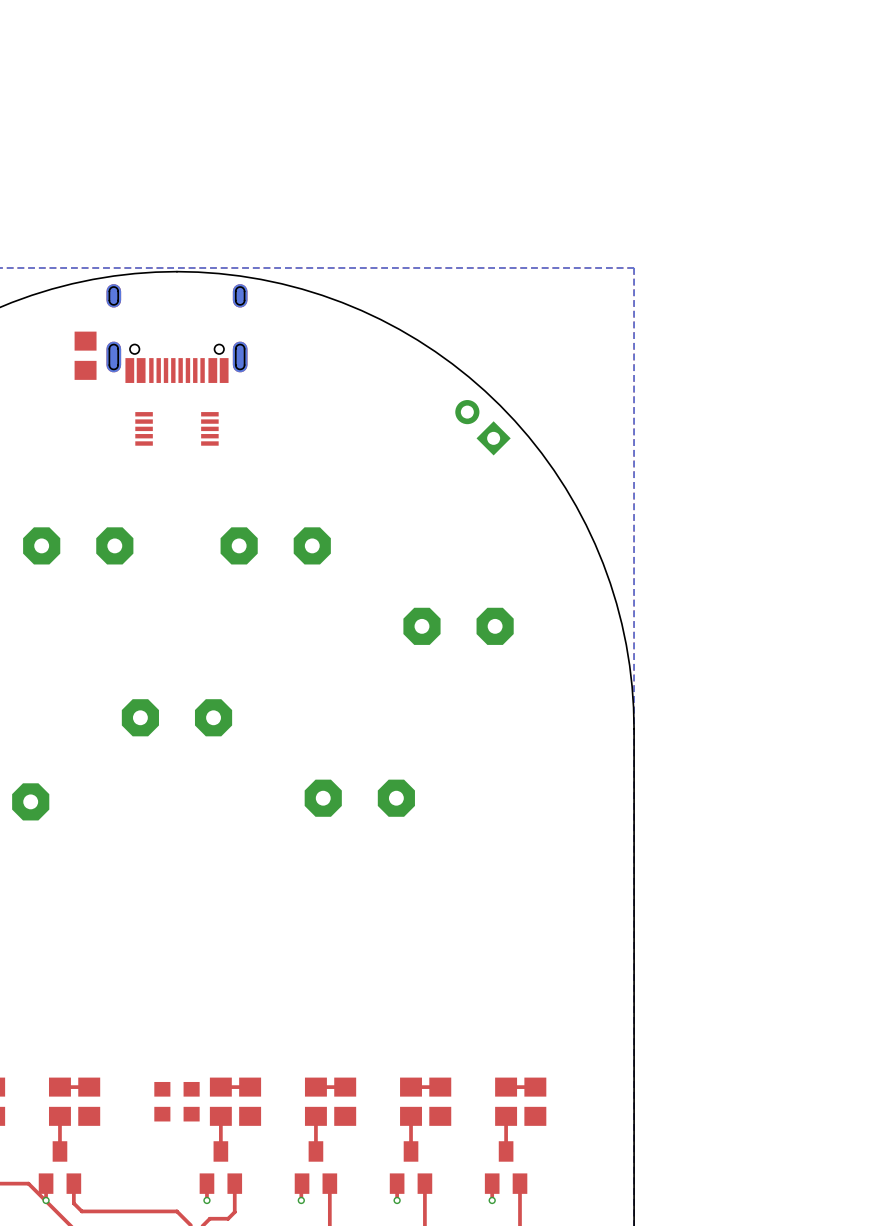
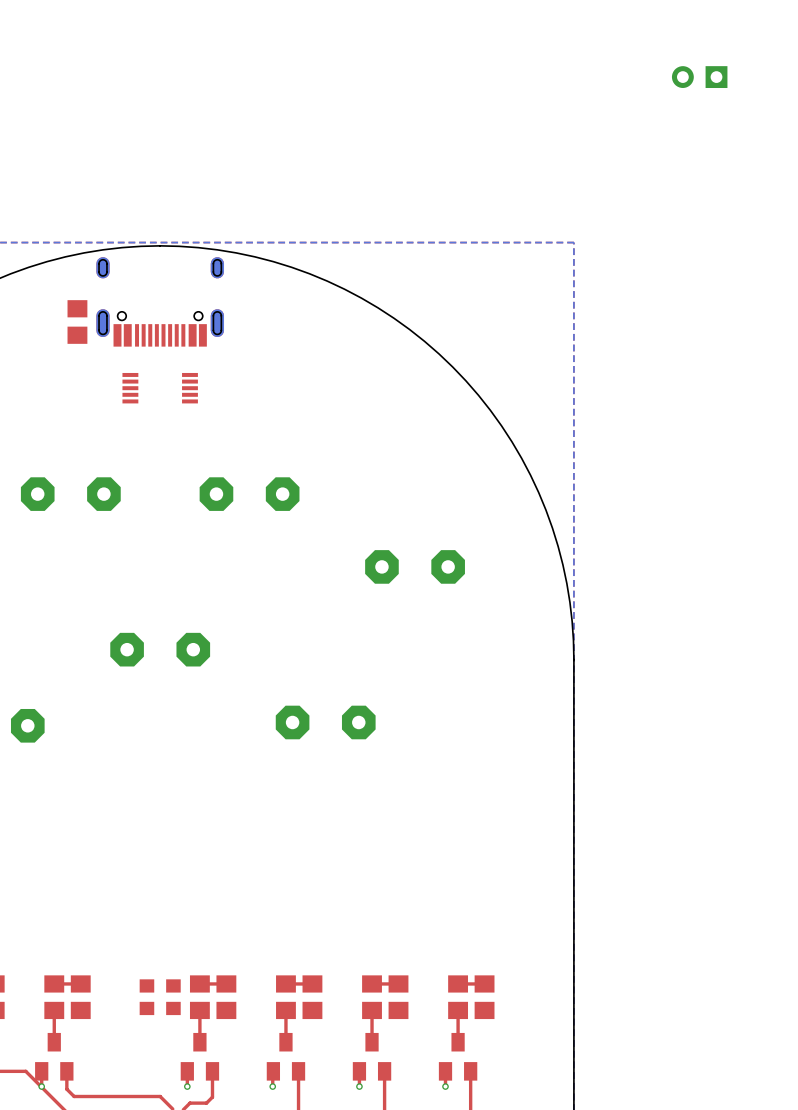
part: none -> (699, 77)
part: (482, 427) -> none

